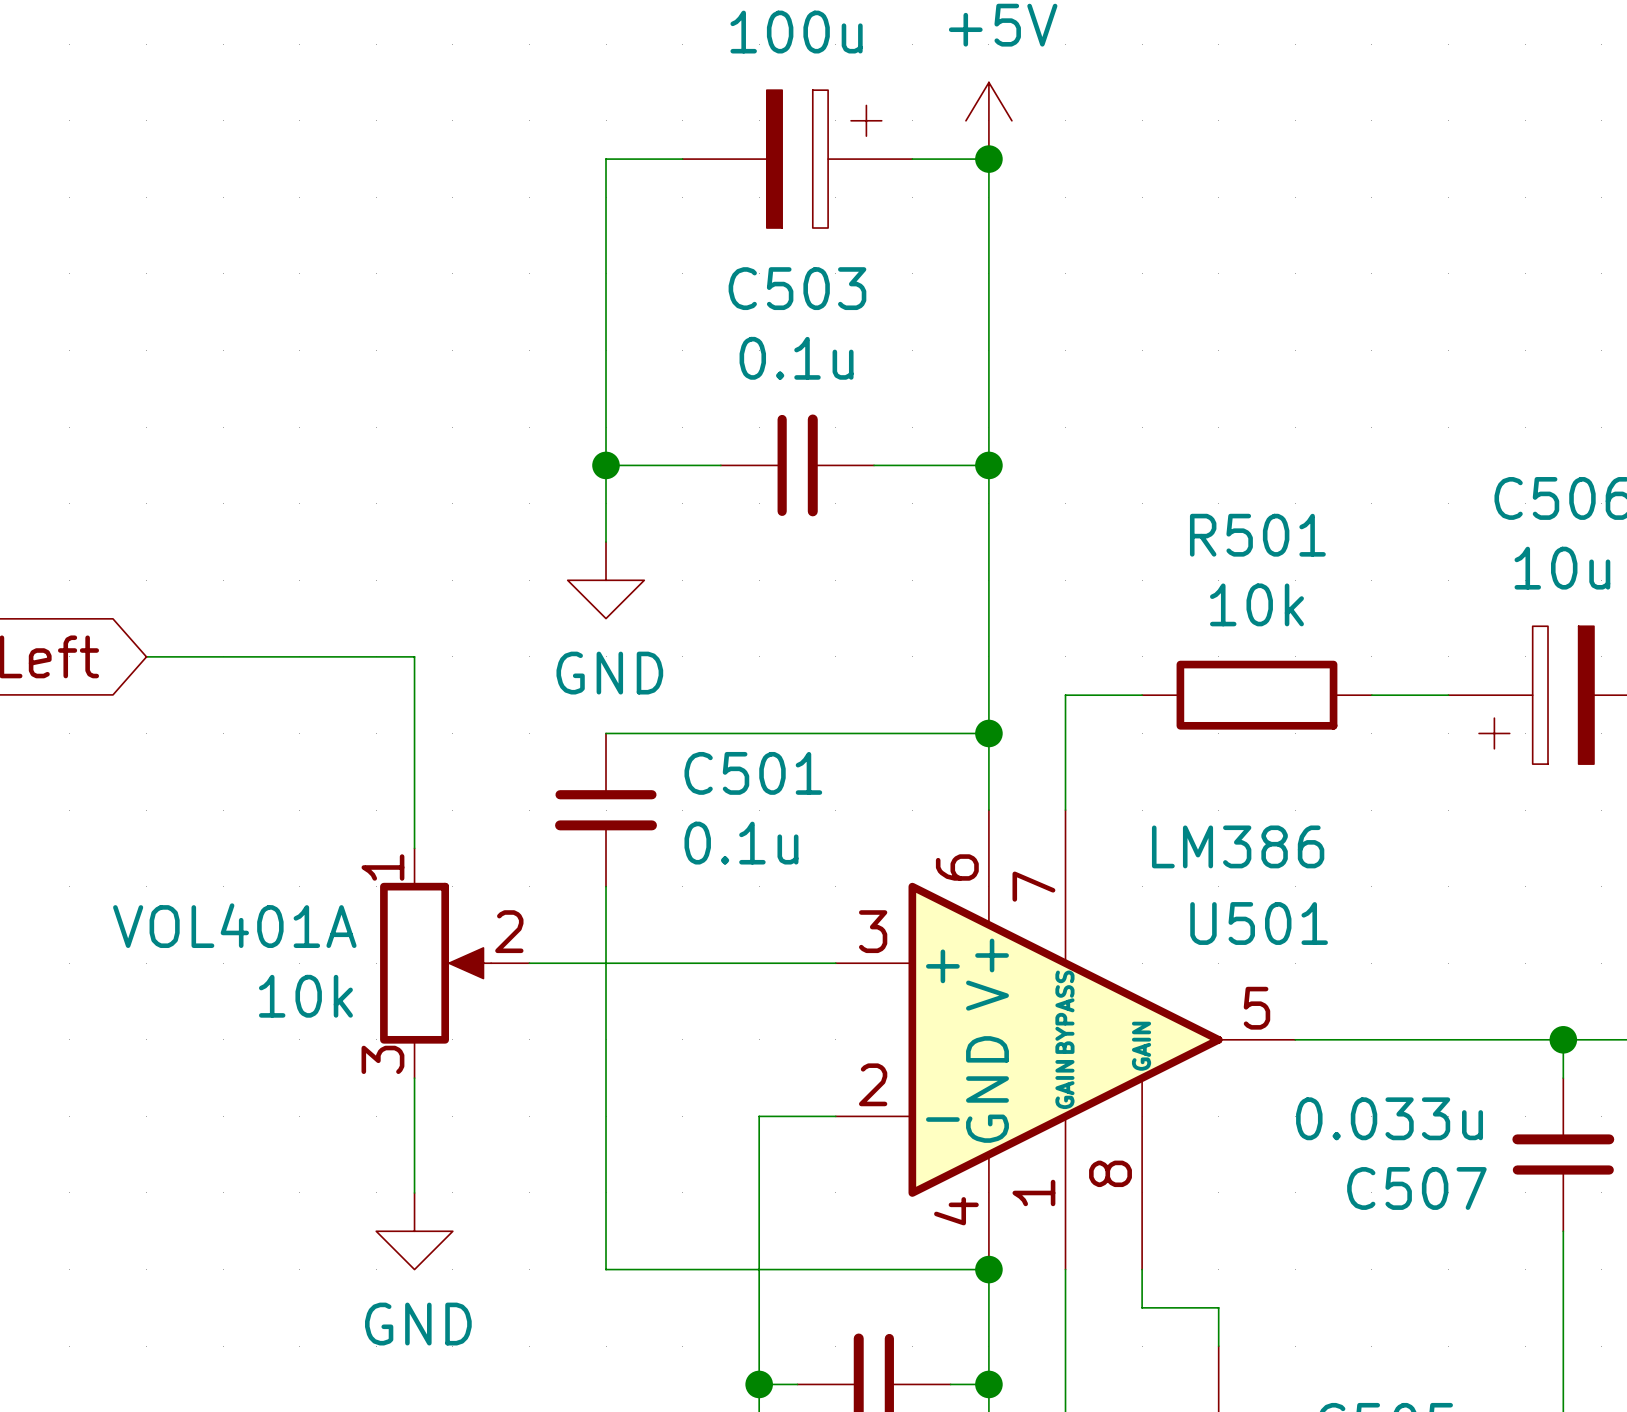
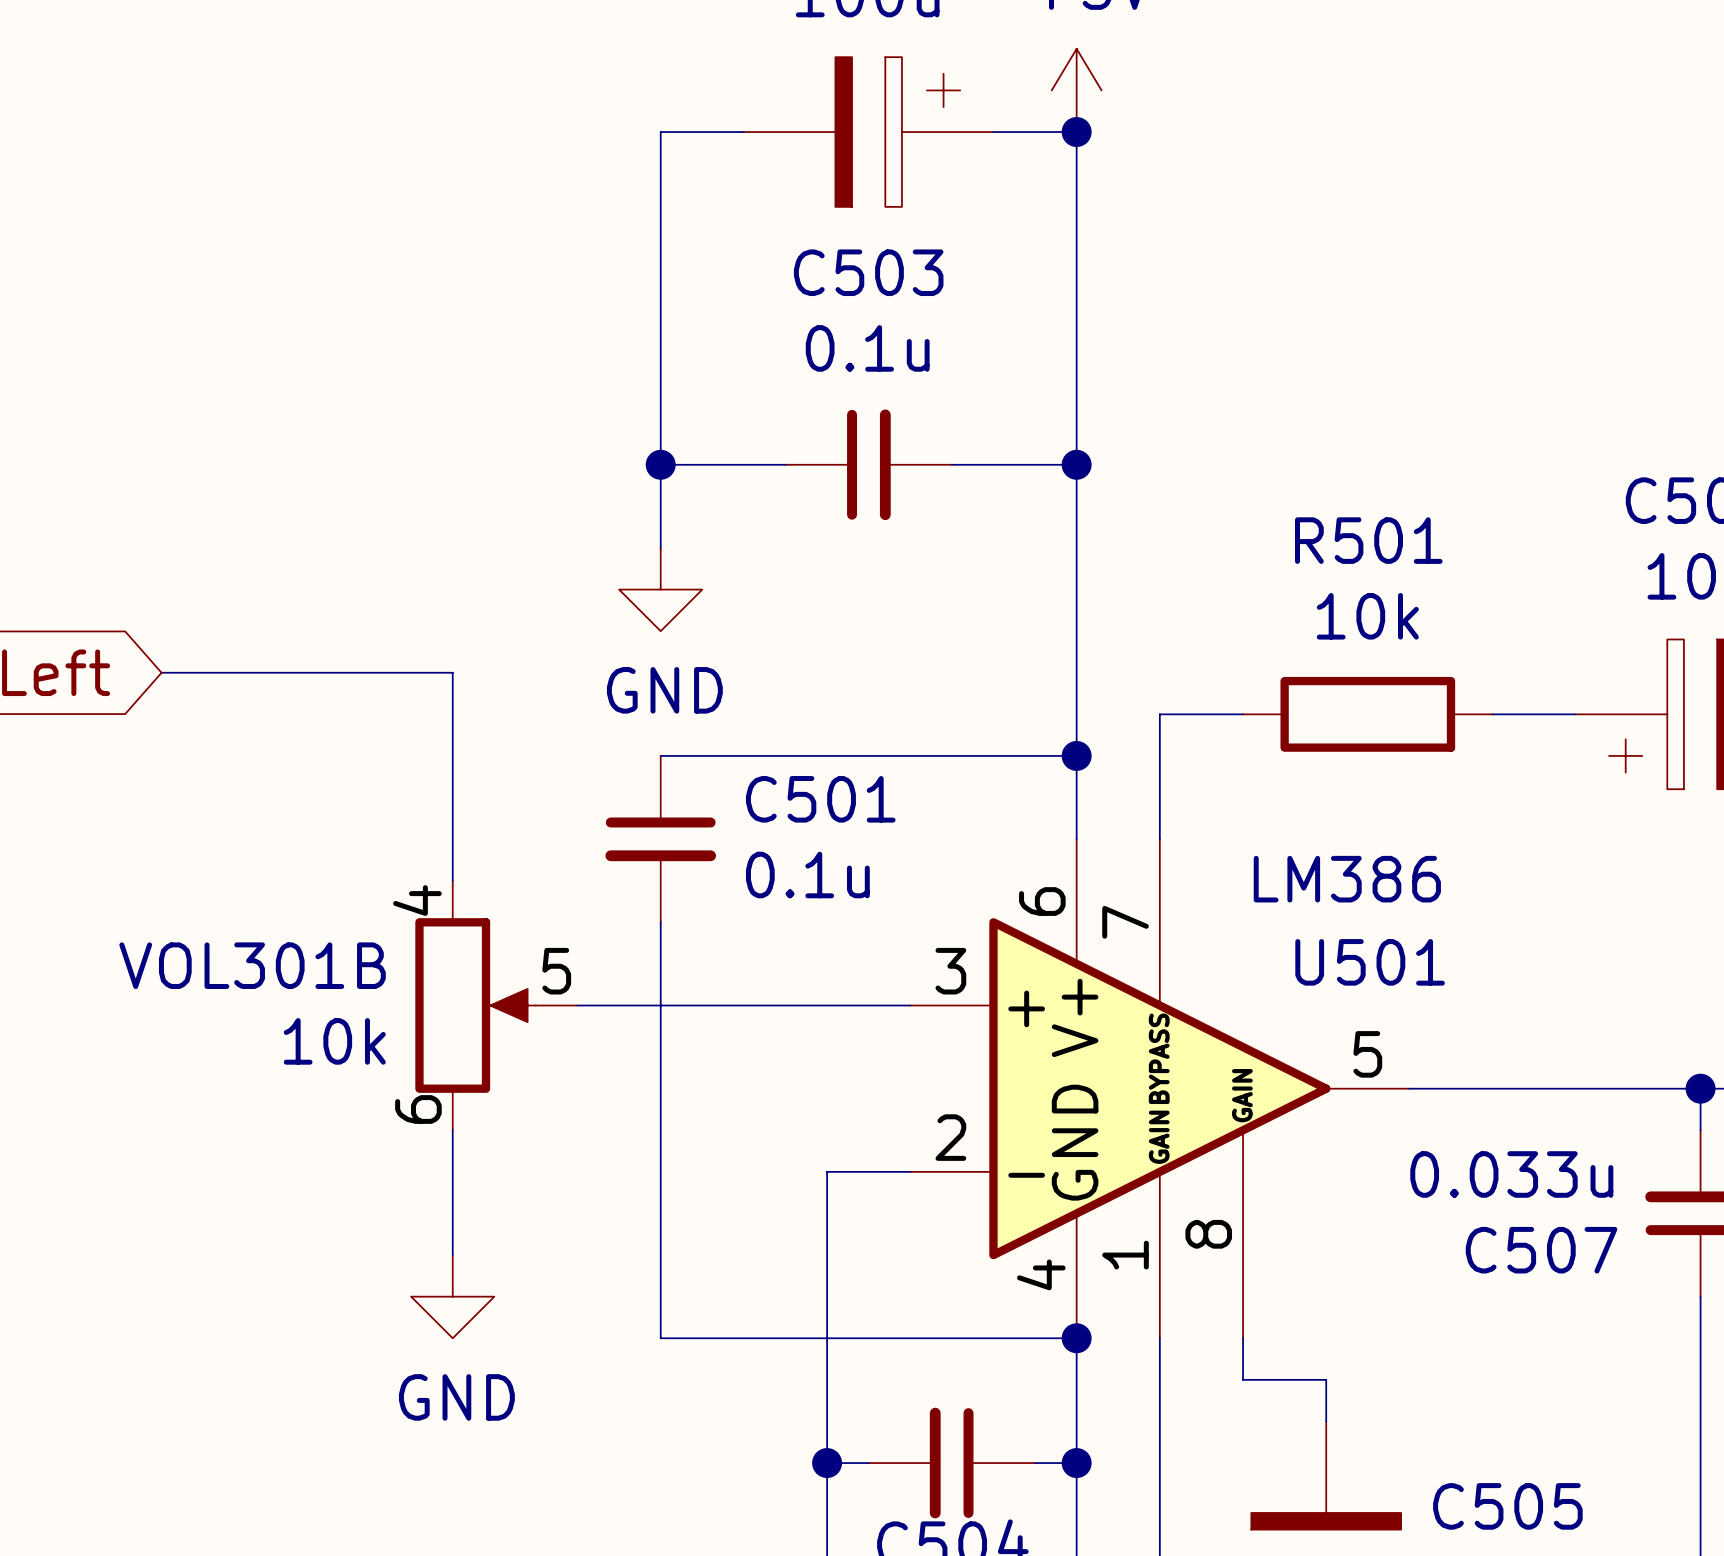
VOL401A pin number: 1 (382, 867) -> 4 (417, 900)
VOL401A name: VOL401A (234, 925) -> VOL301B (252, 965)
VOL401A pin number: 2 (509, 931) -> 5 (556, 971)
VOL401A pin number: 3 (382, 1059) -> 6 (418, 1109)

